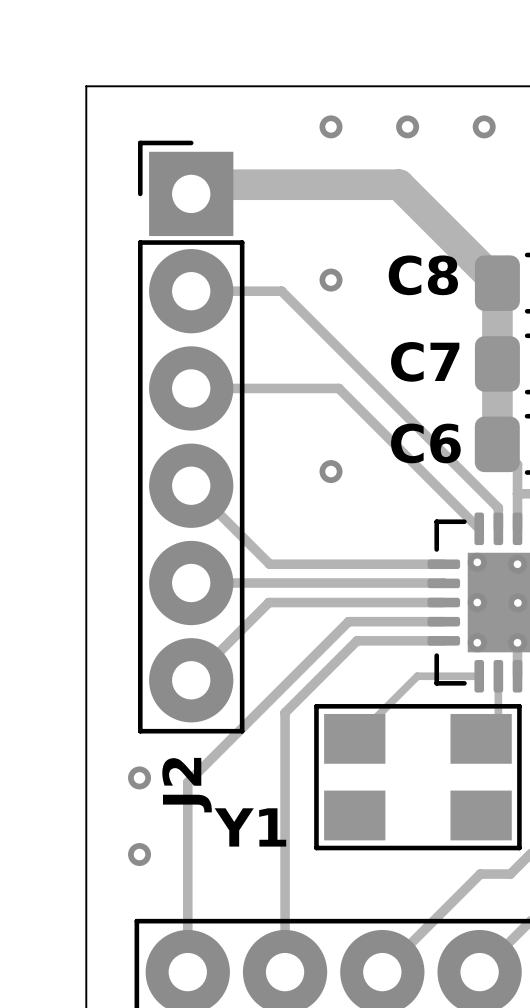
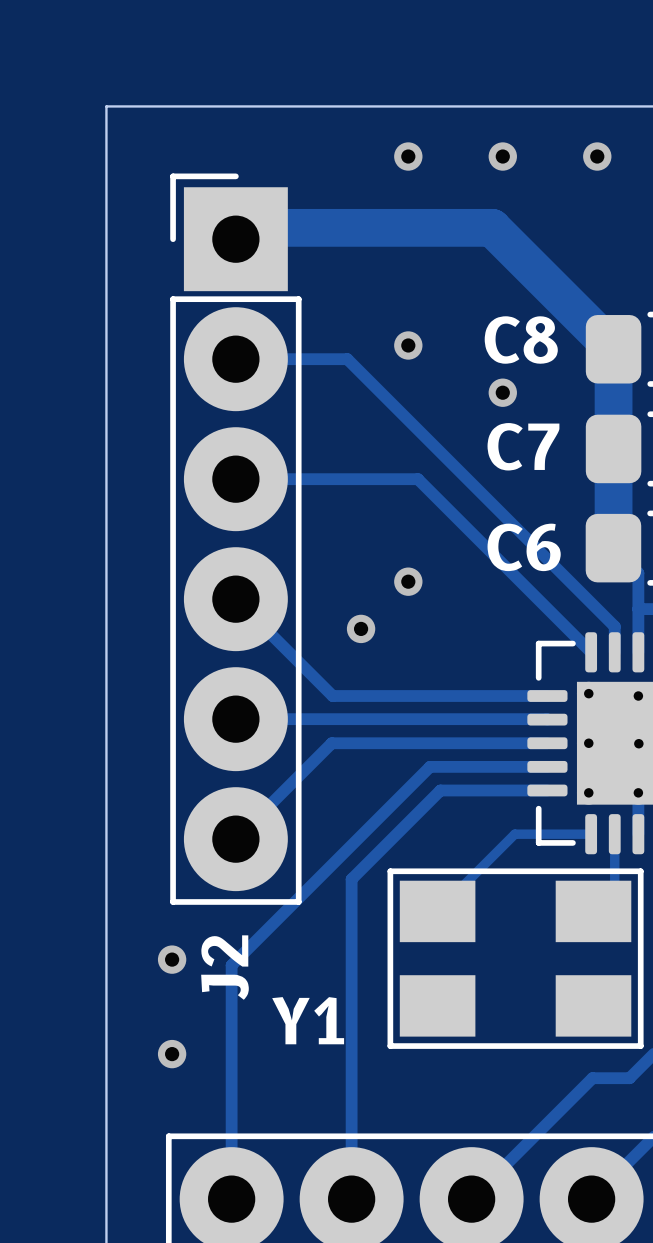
via: none -> (502, 392)
via: none -> (361, 628)

